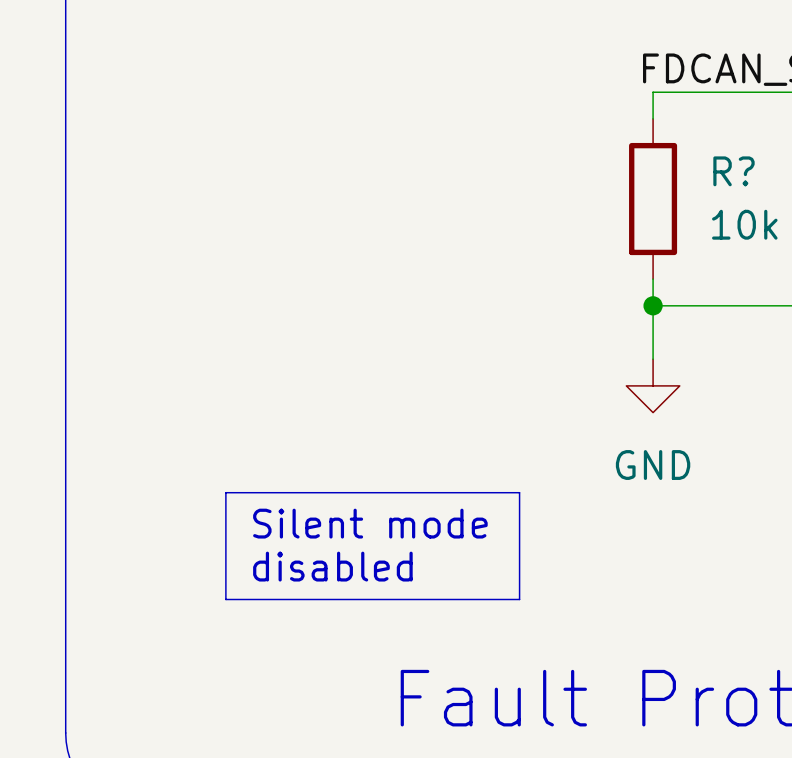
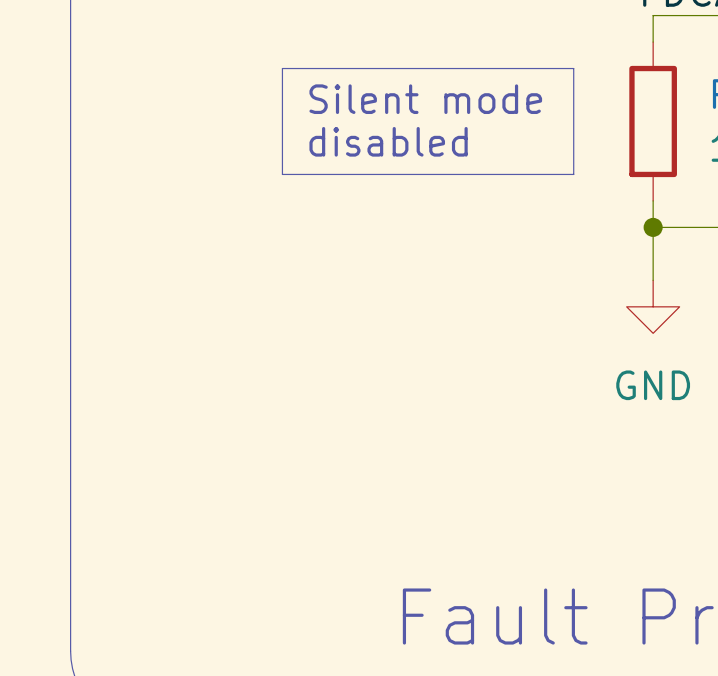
line: (225, 492) (519, 492) (519, 599) (225, 599) (225, 492) -> (282, 68) (573, 68) (573, 174) (282, 174) (282, 68)
text position: Silent mode (370, 523) -> Silent mode (425, 99)
text position: disabled (332, 566) -> disabled (388, 141)

